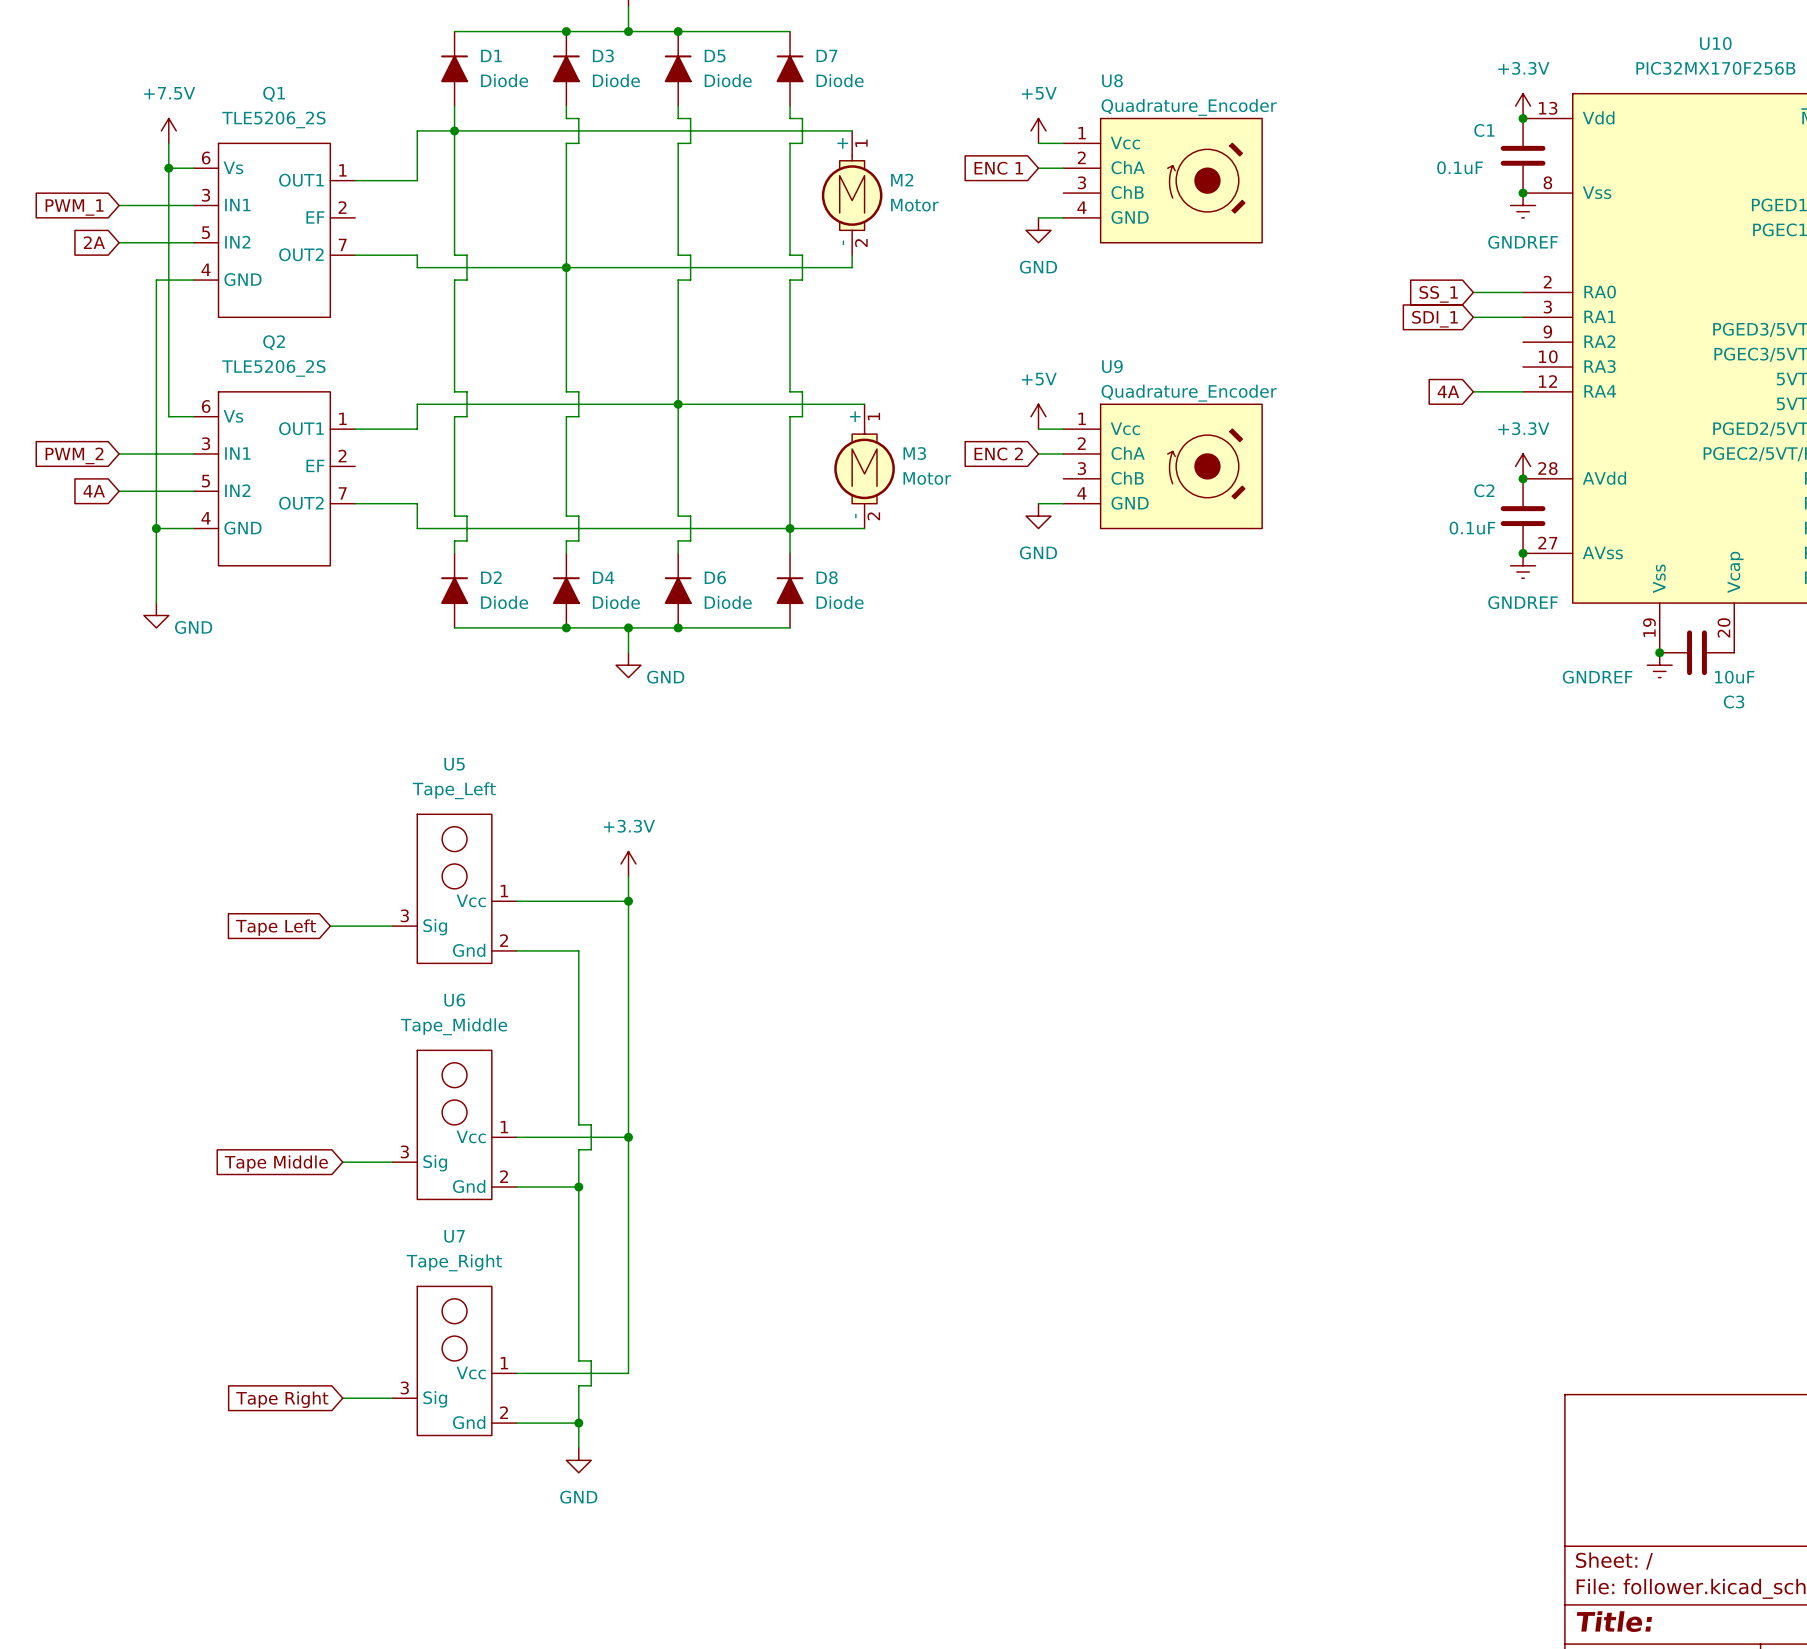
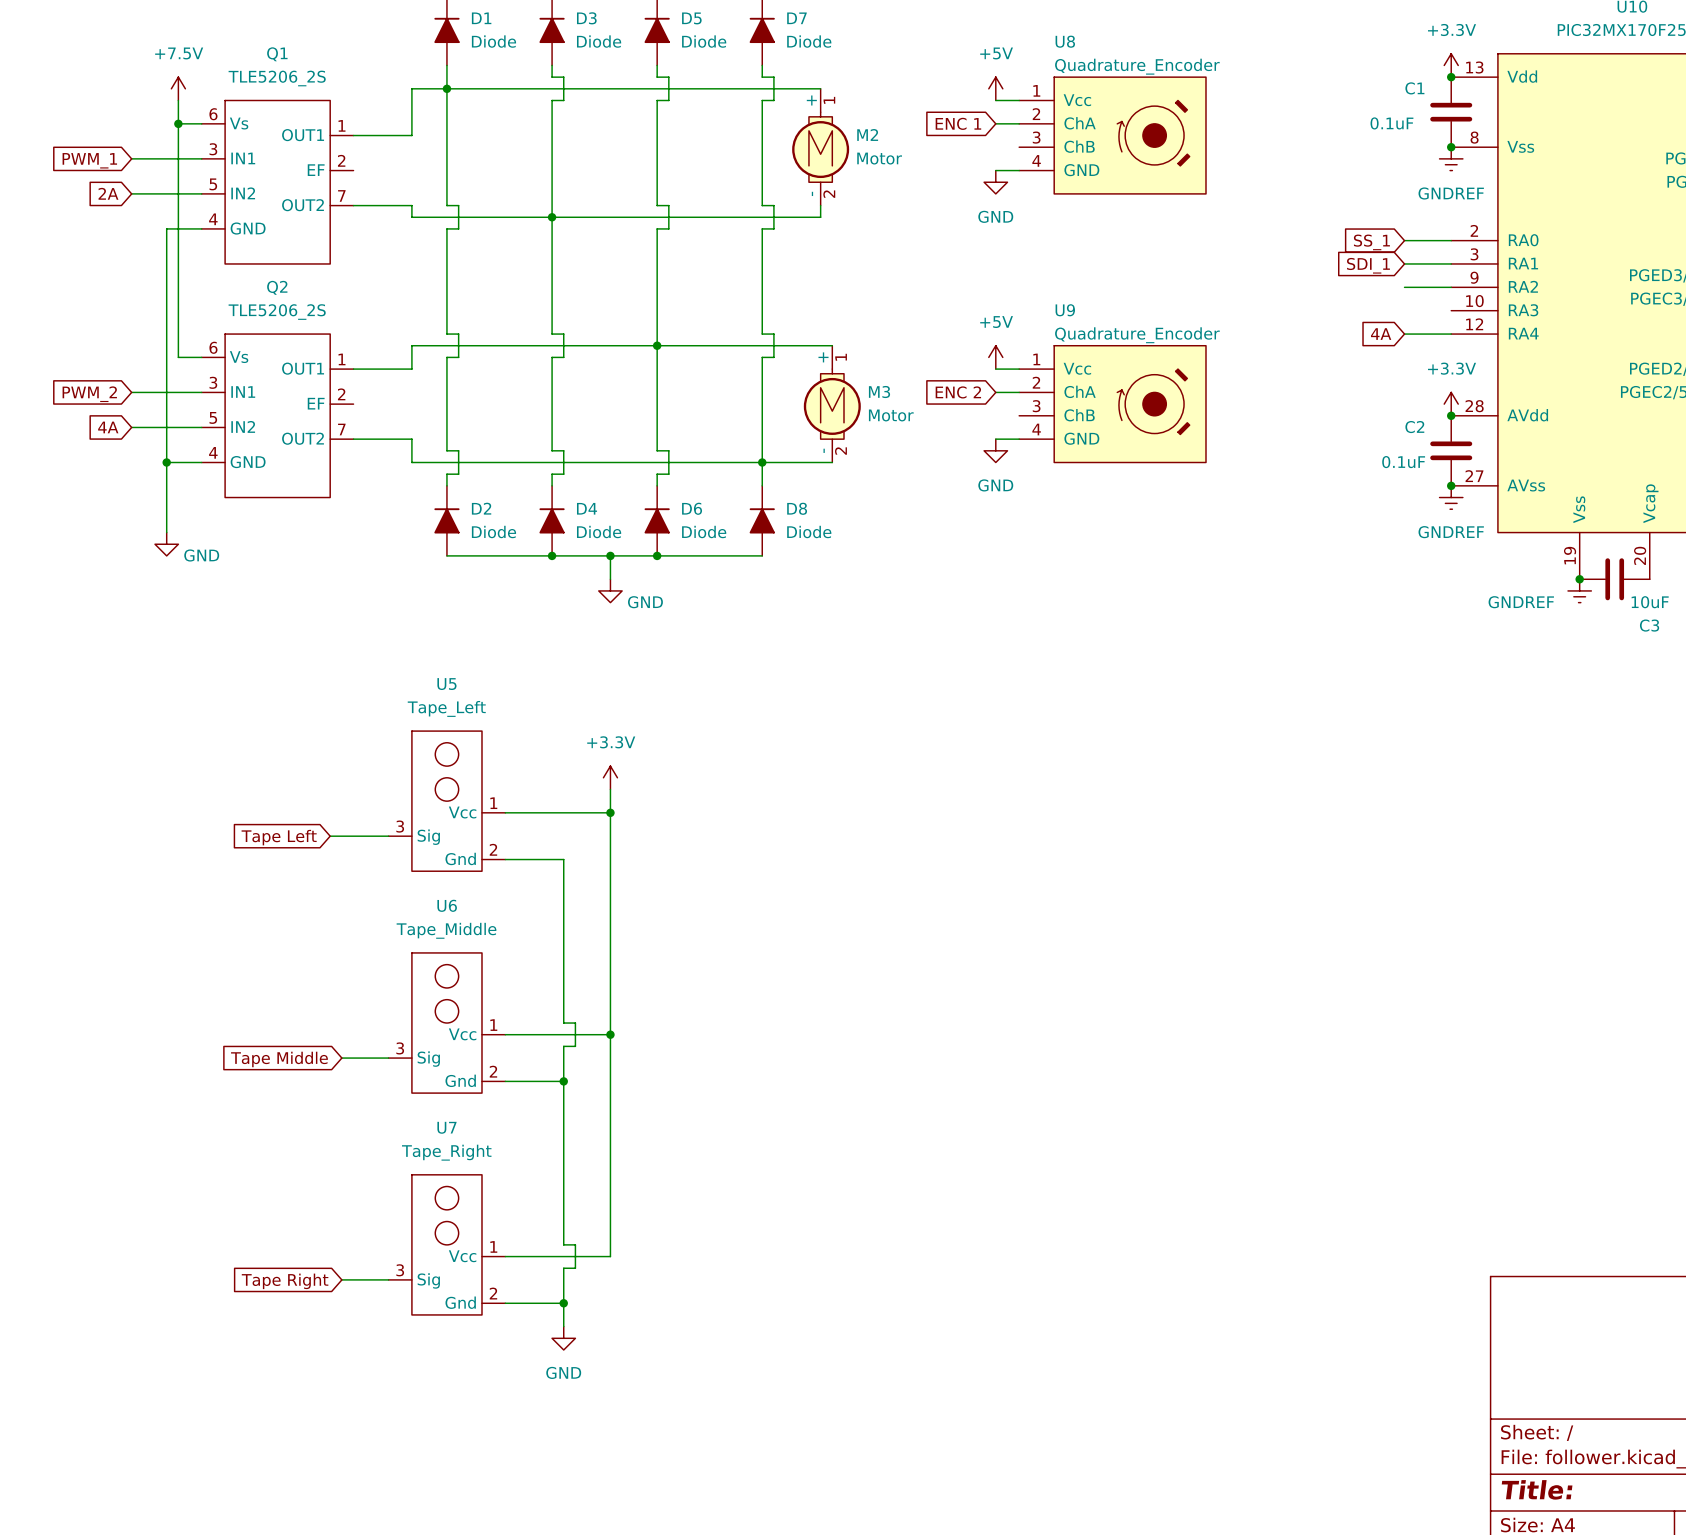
wire: none -> (1404, 287) (1451, 287)

